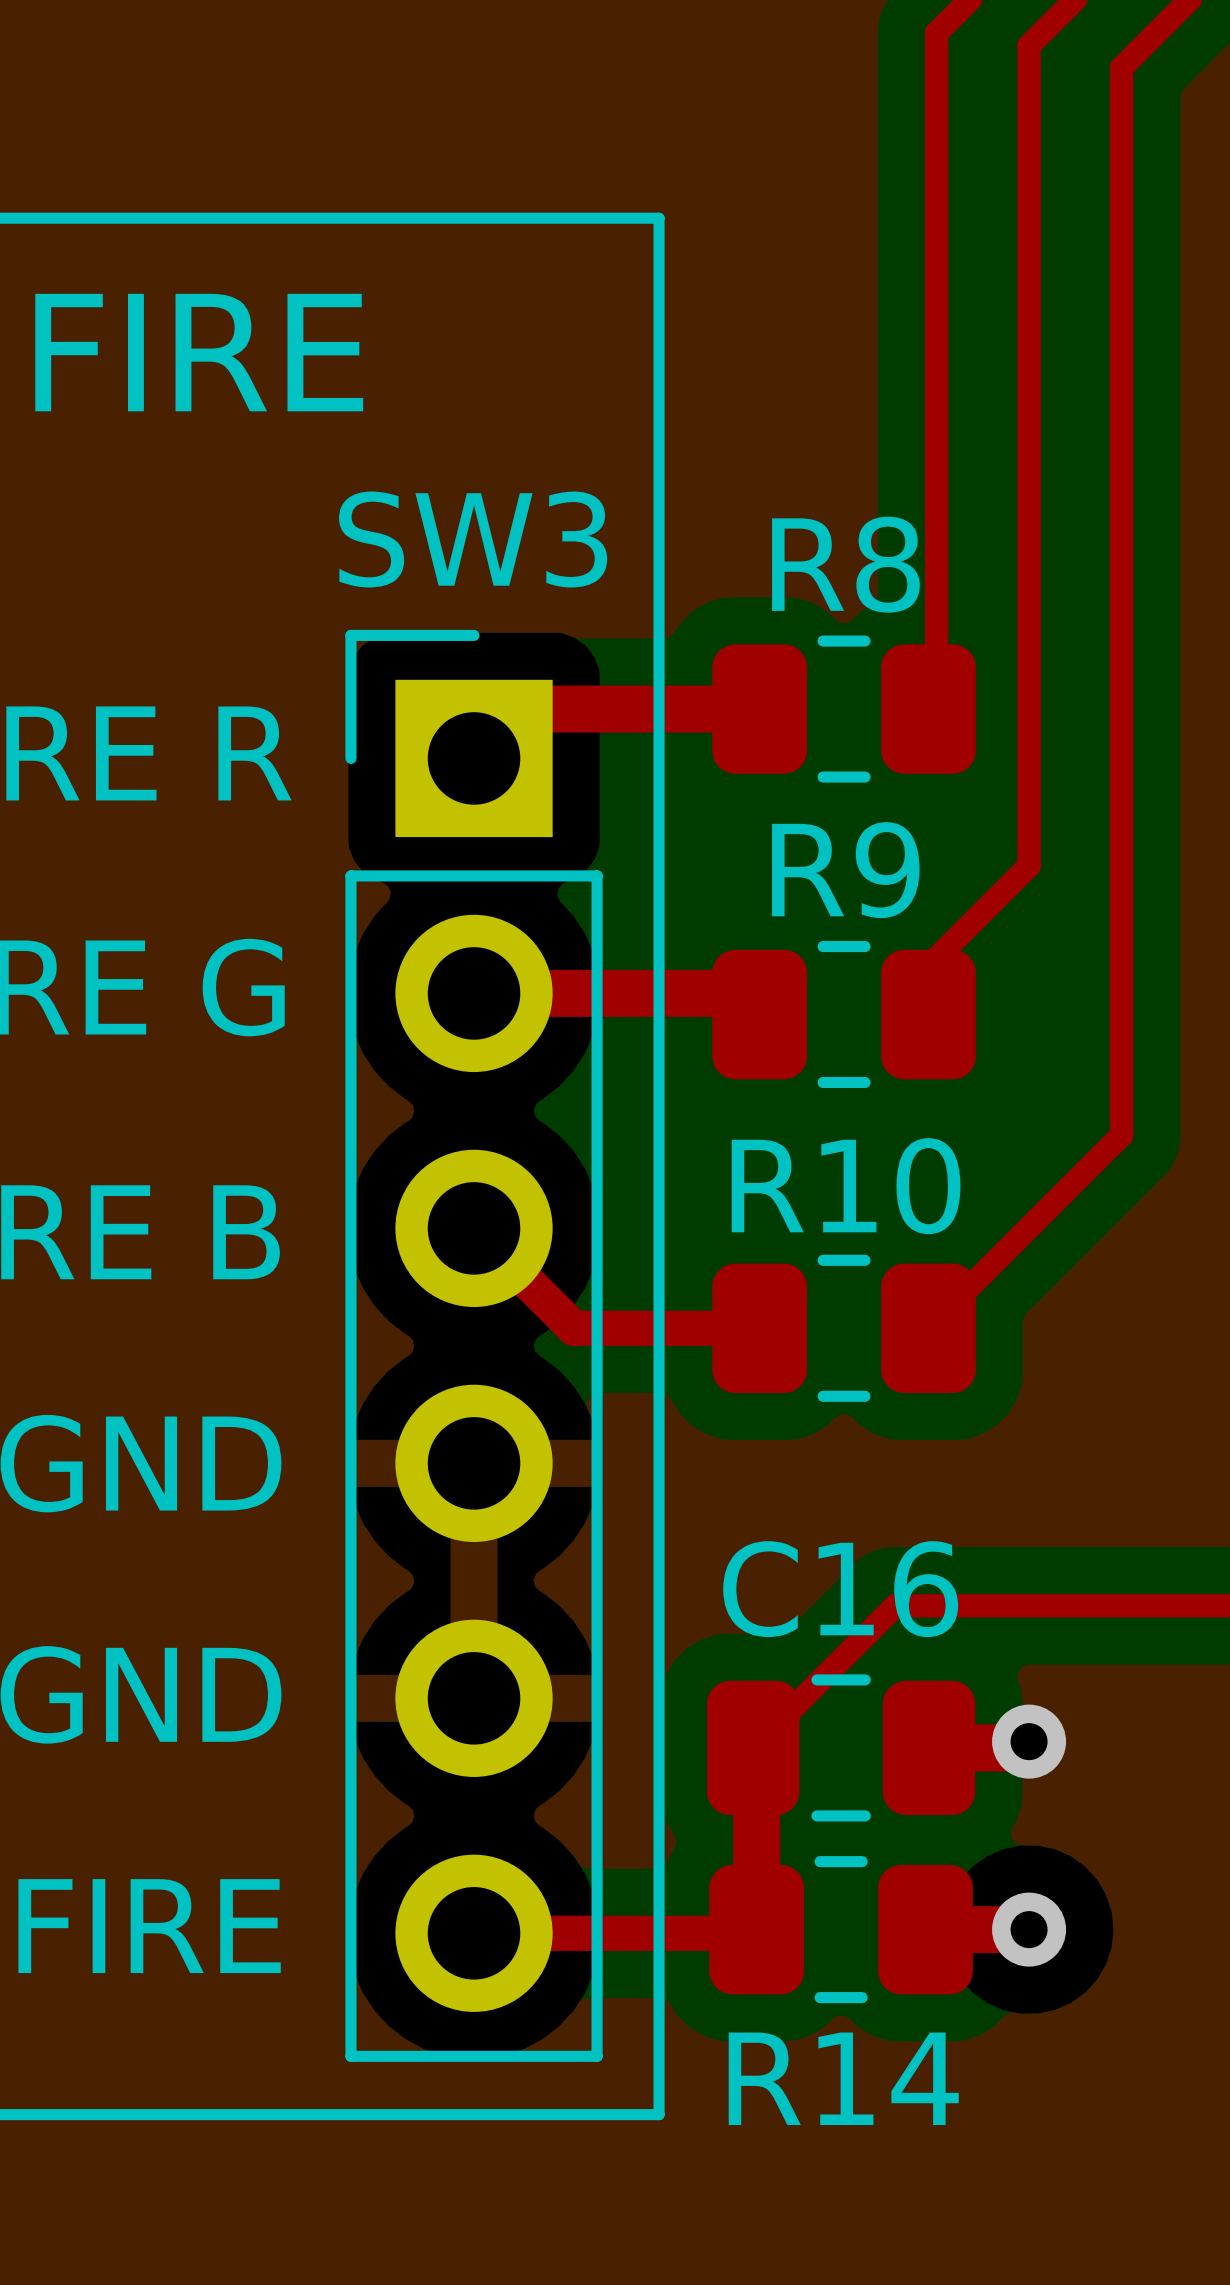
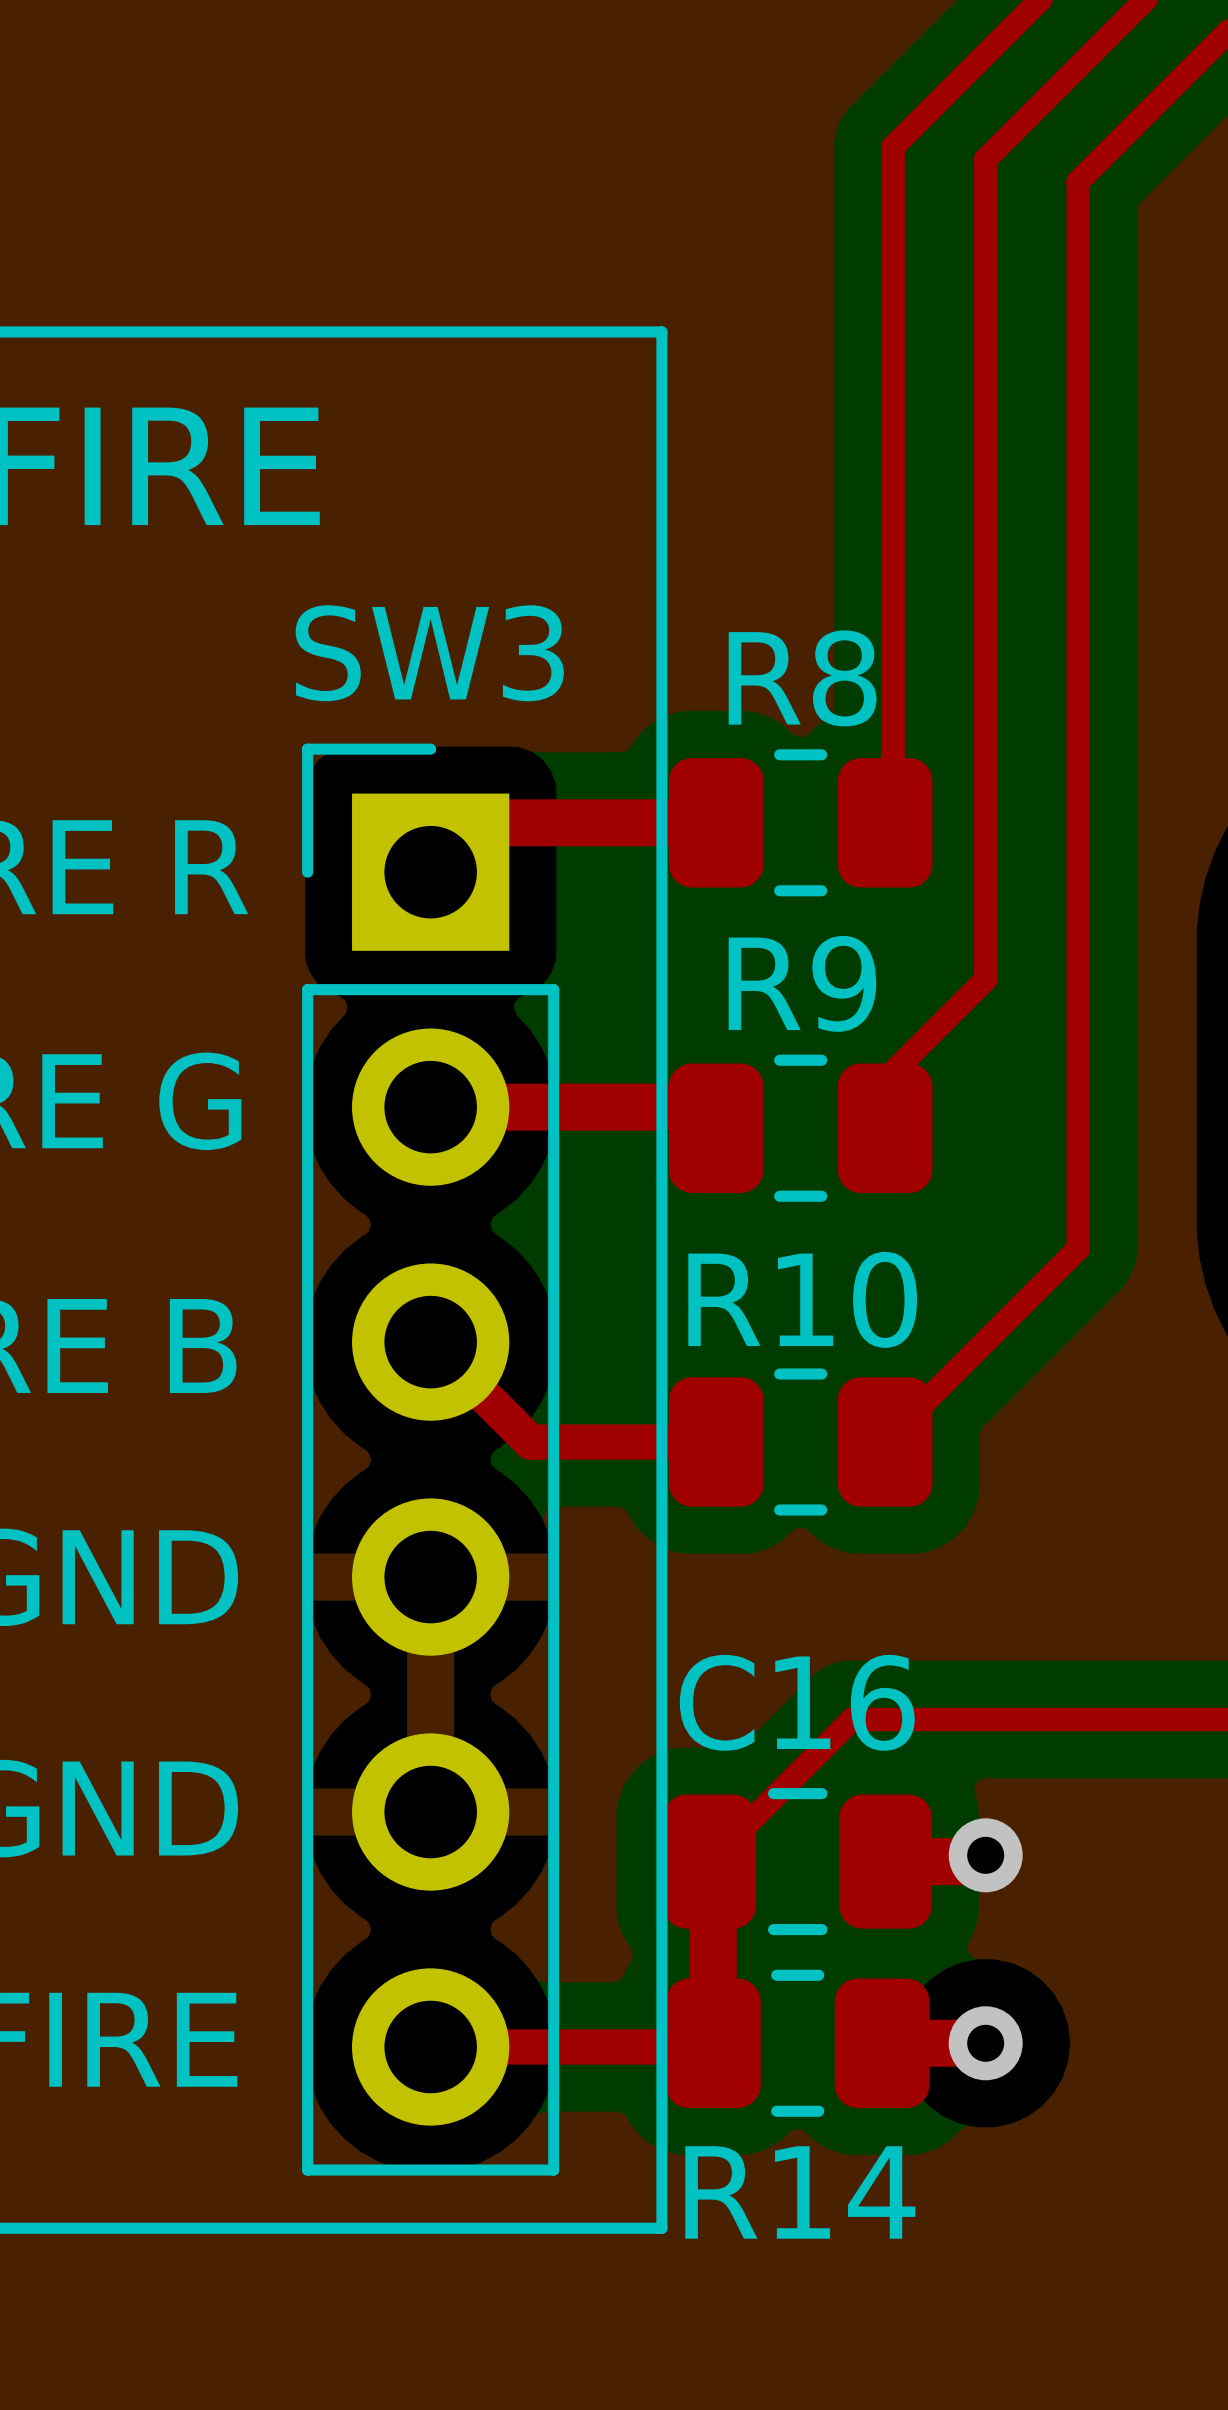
line: (659, 218) (659, 2114) -> (615, 331) (661, 331) (661, 2228) (615, 2228)

